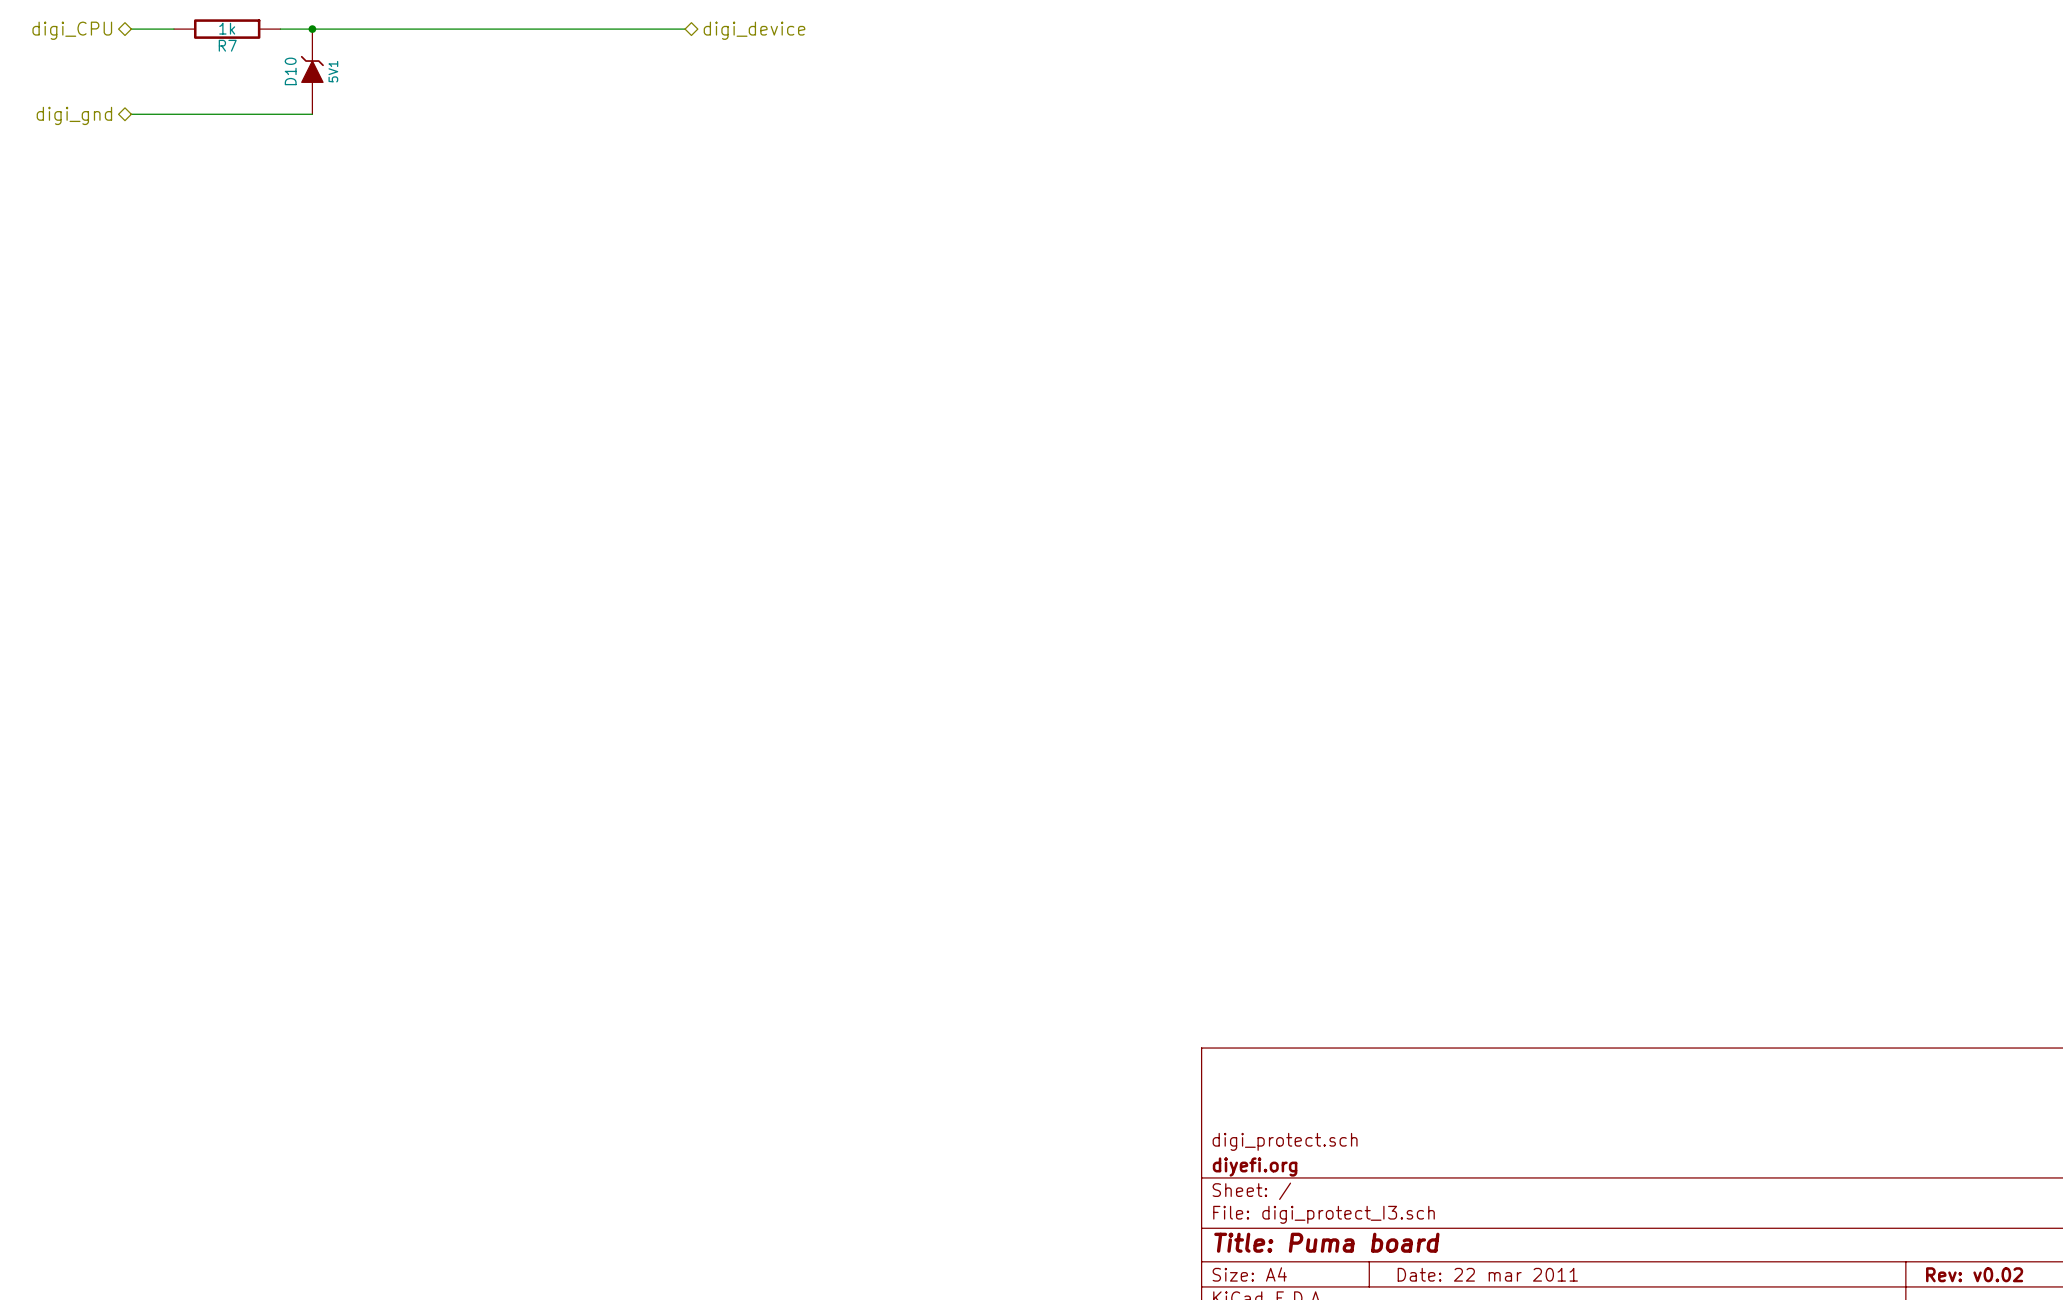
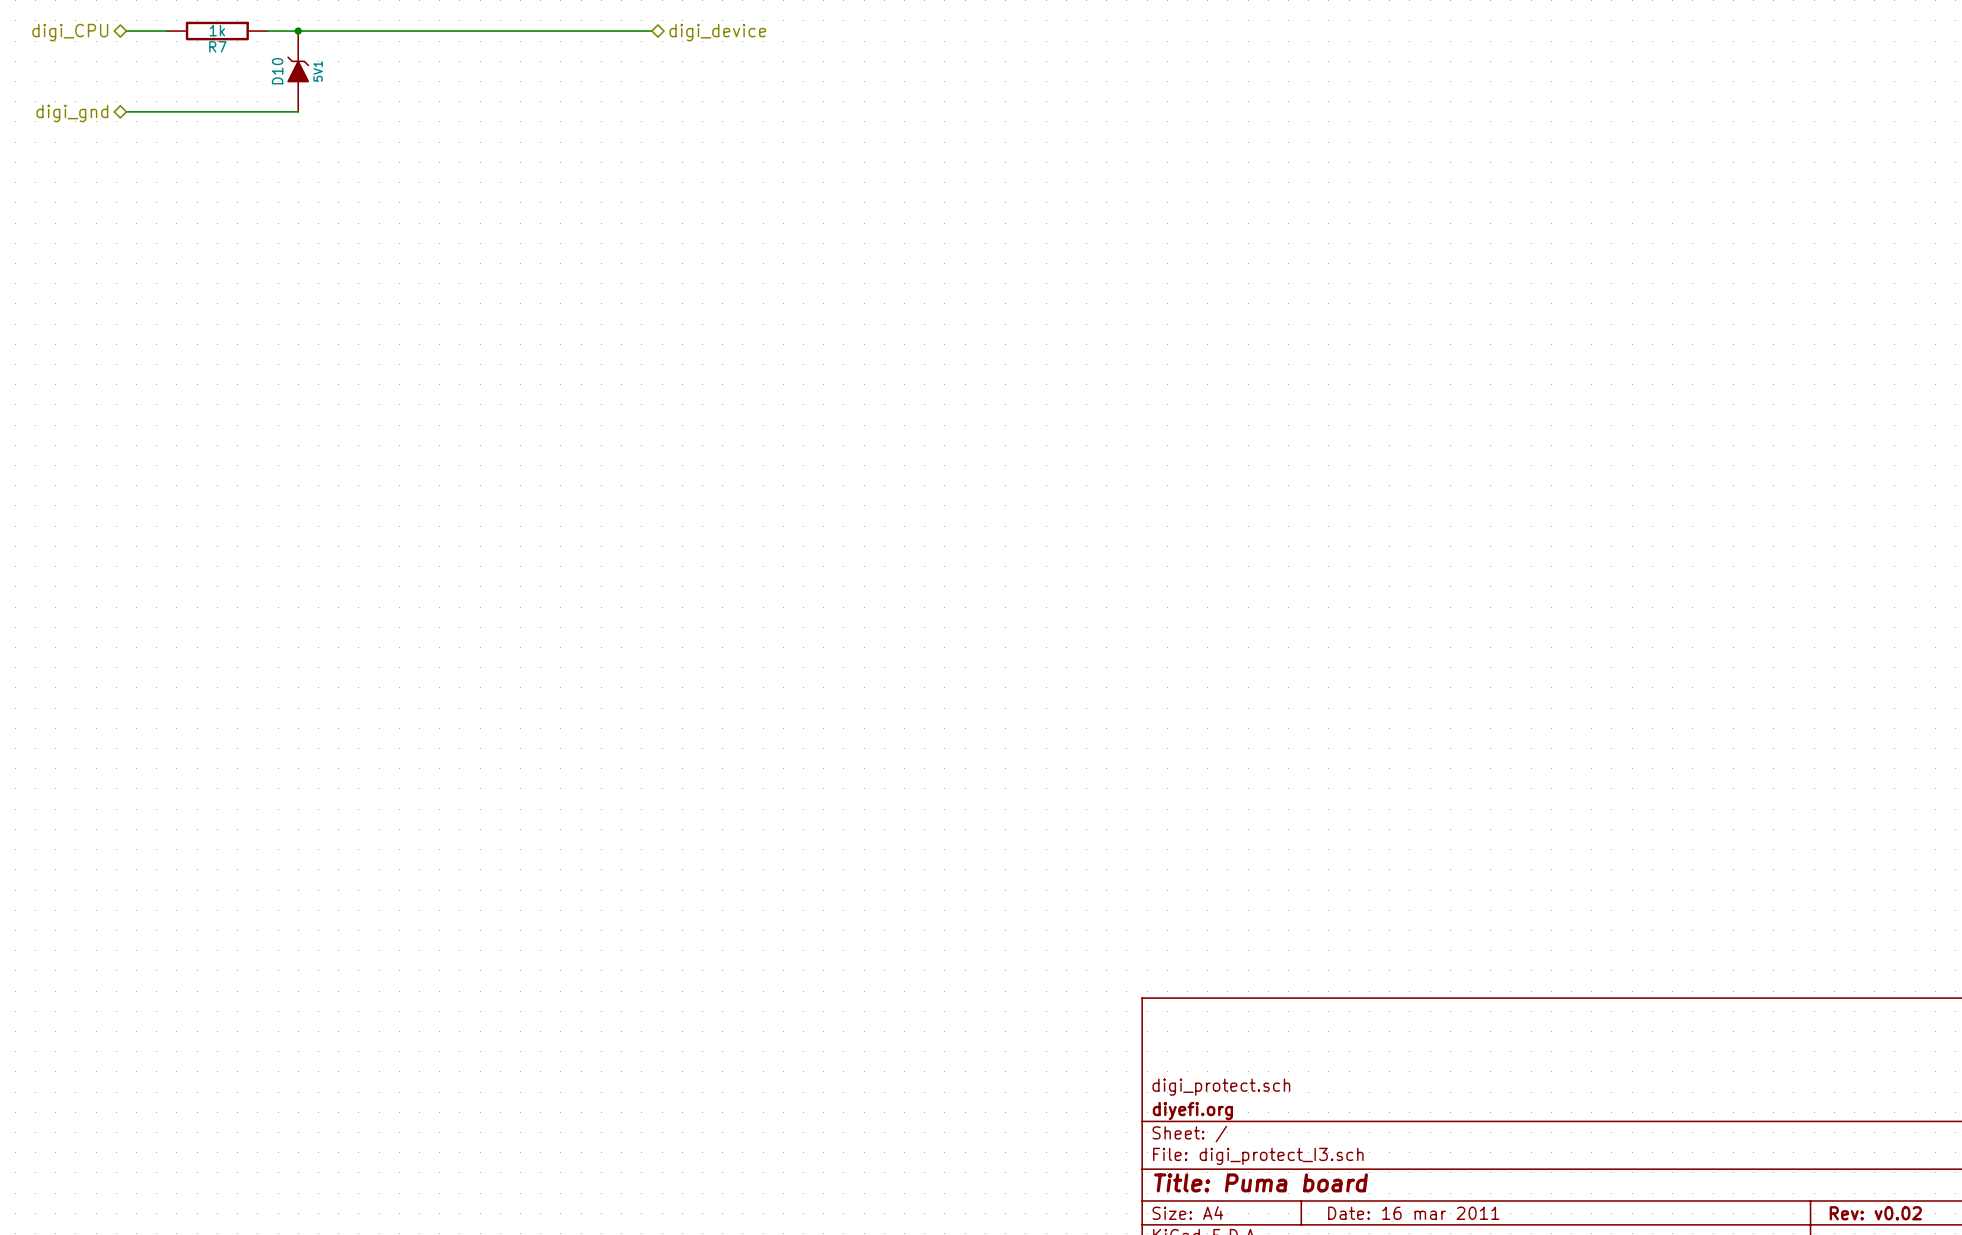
title block: Date: 22 mar 2011 (1487, 1274) -> Date: 16 mar 2011 (1413, 1213)

